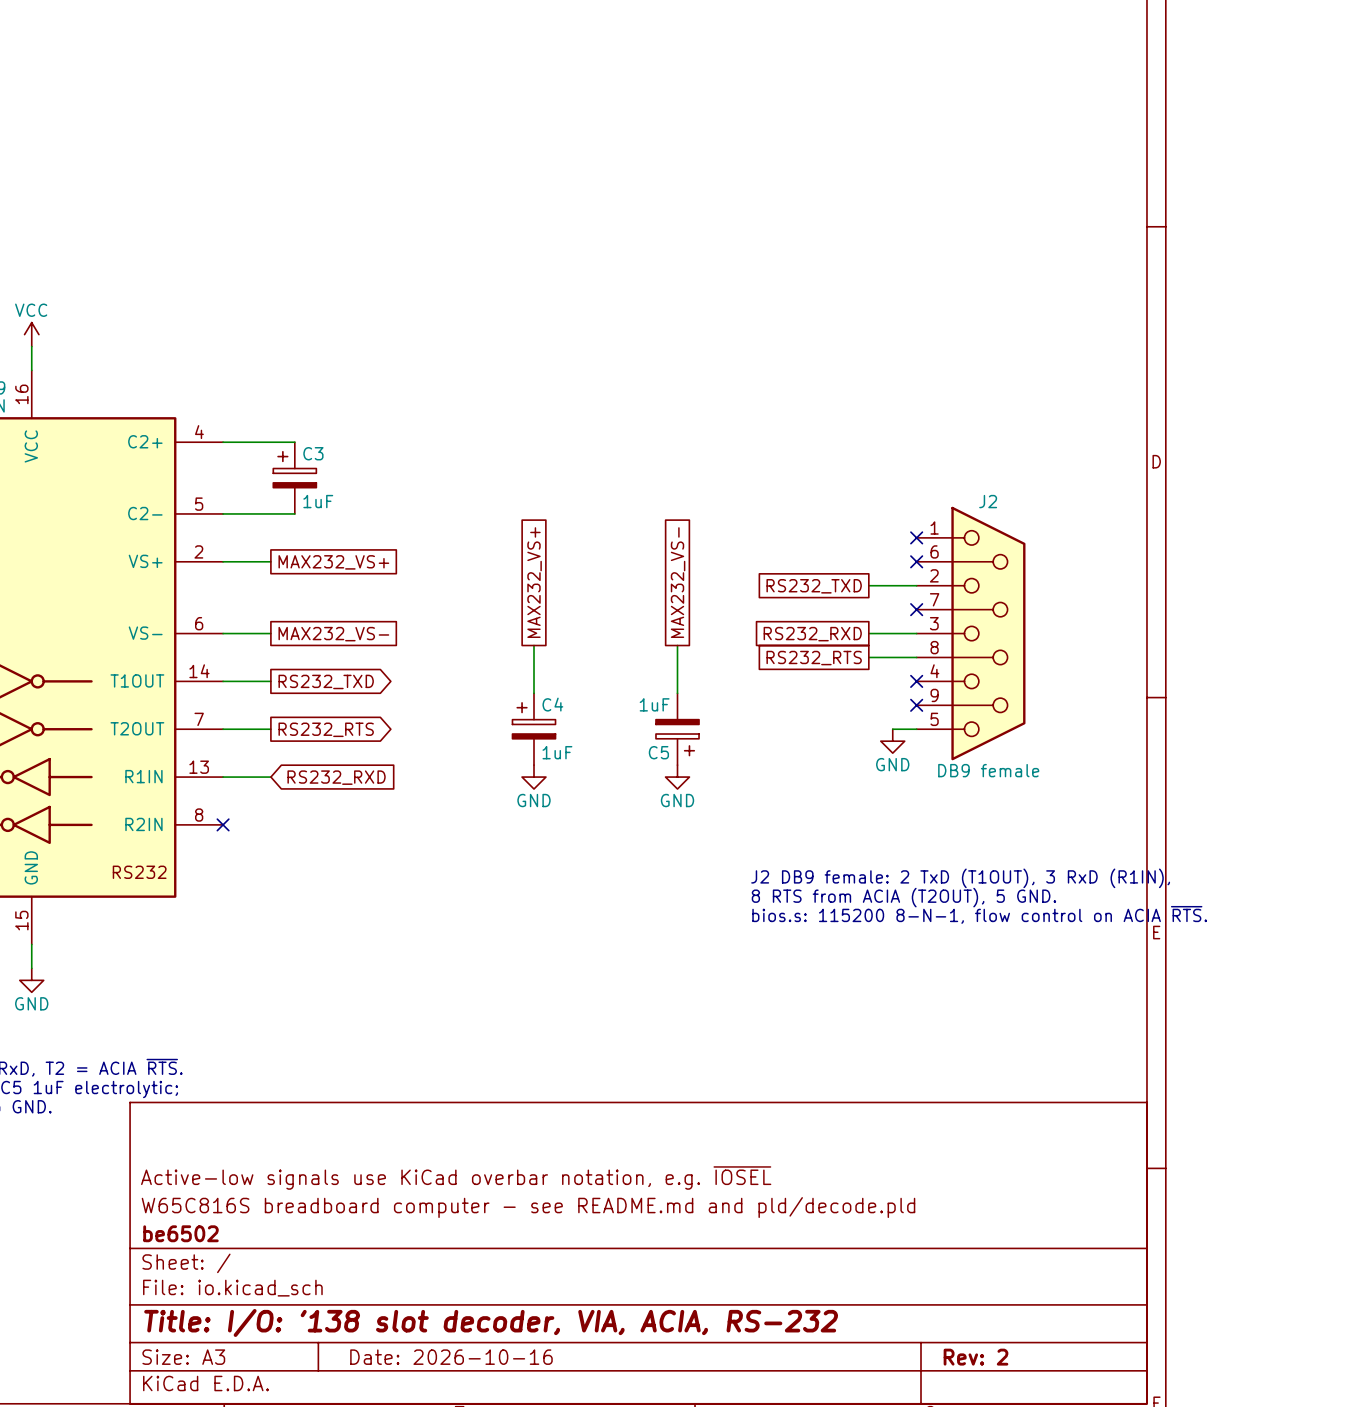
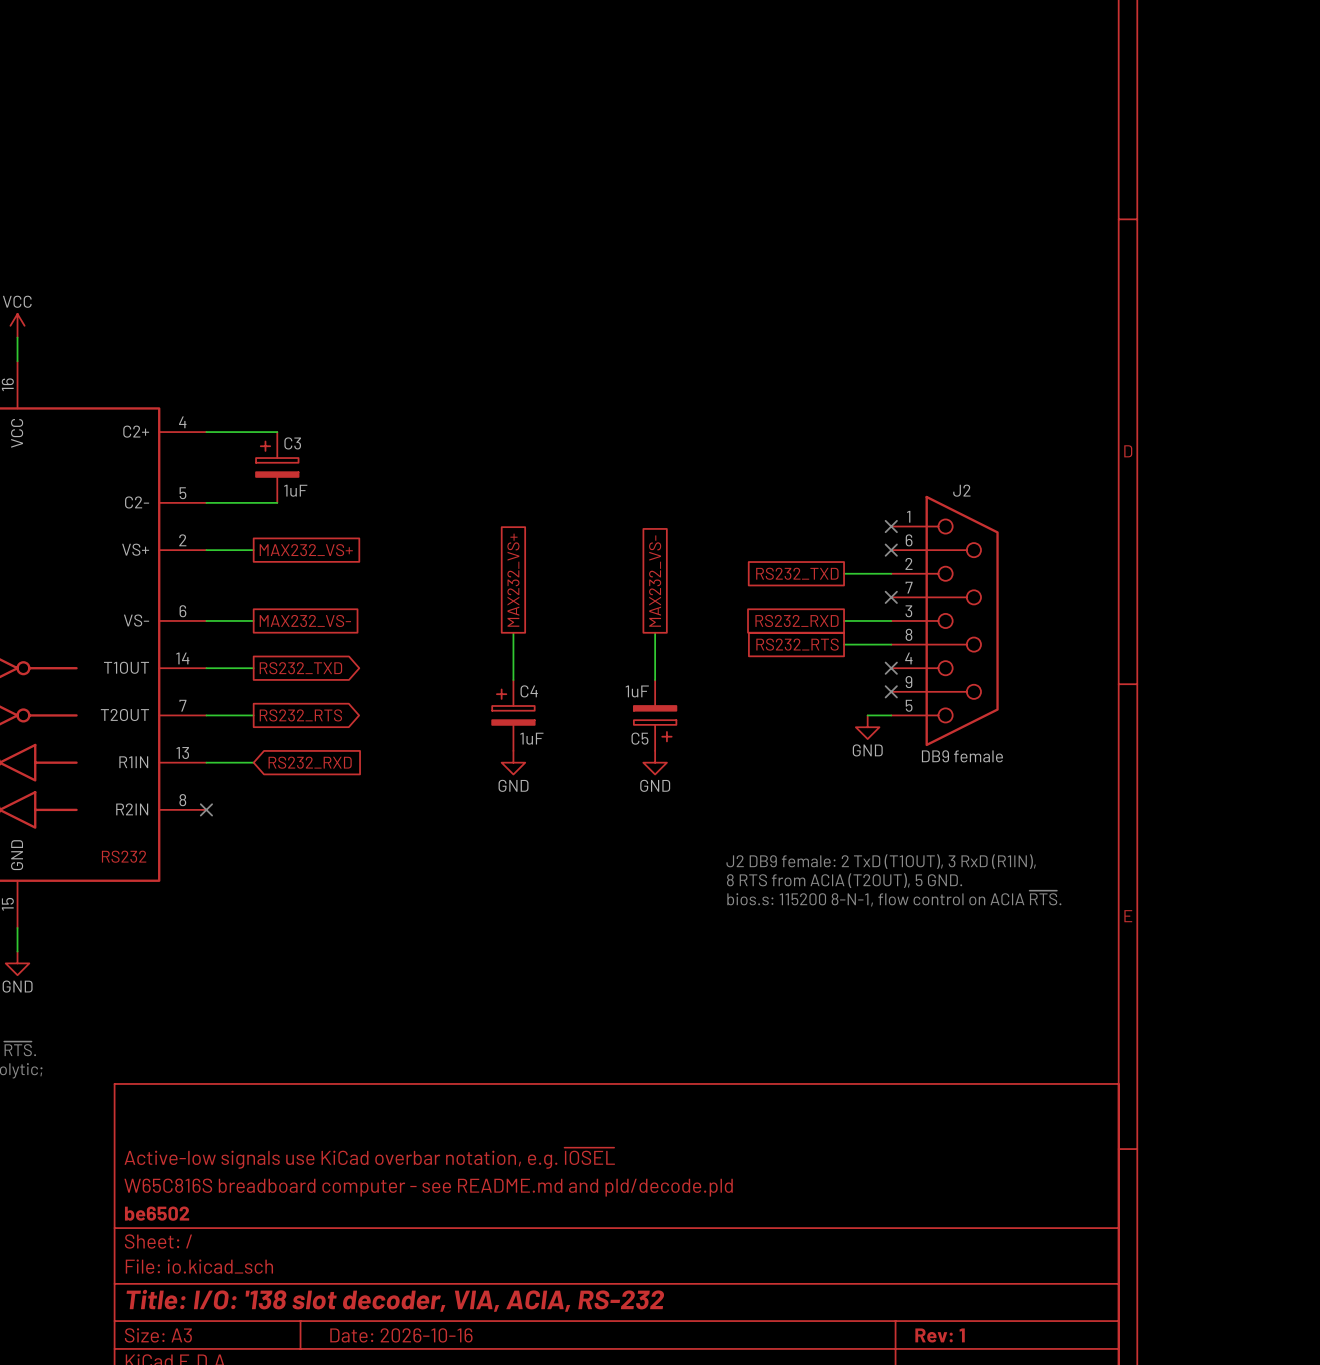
title block: Rev: 2 (975, 1357) -> Rev: 1 (940, 1335)

